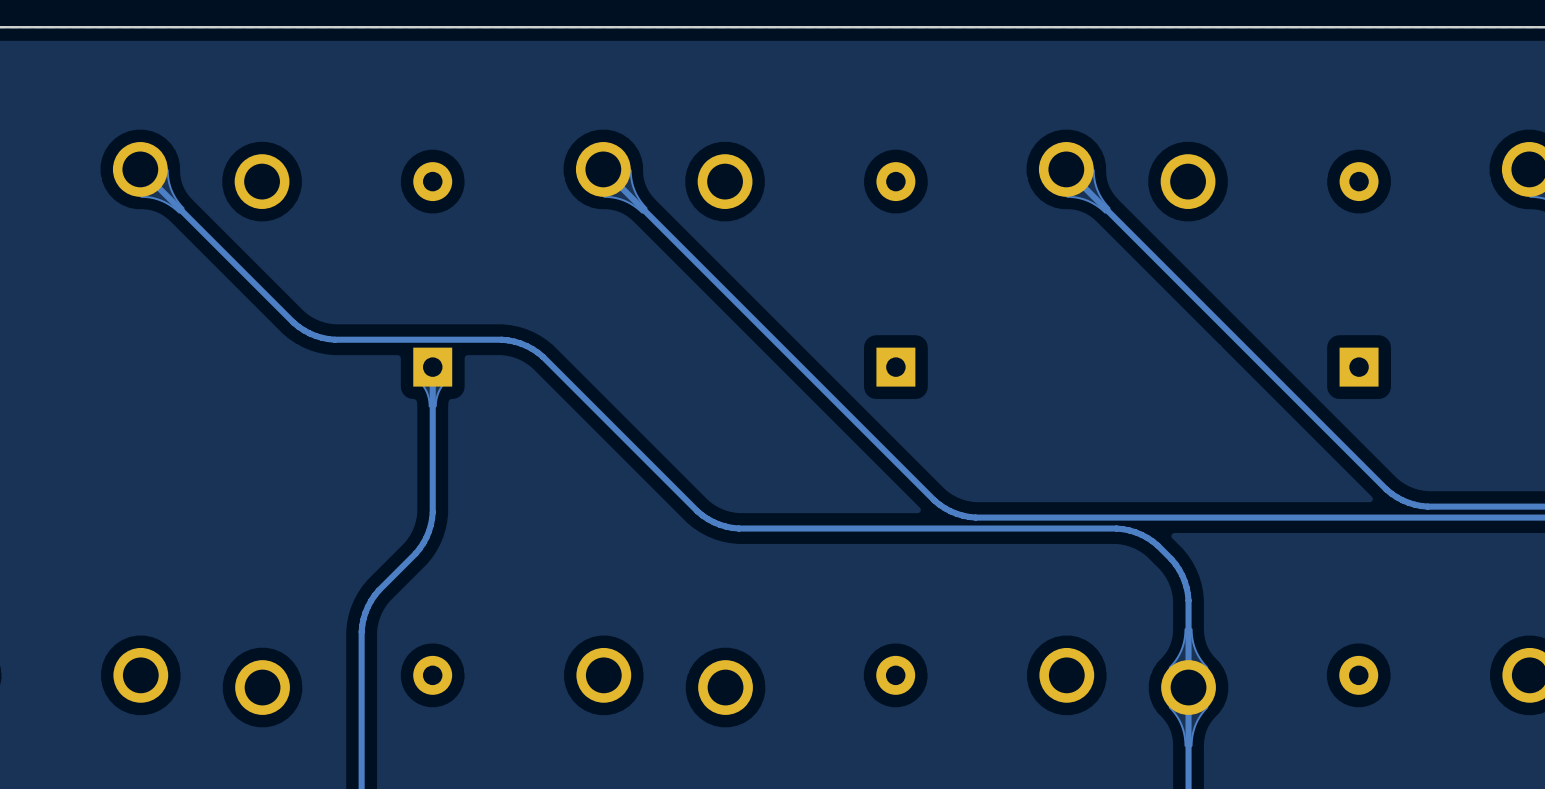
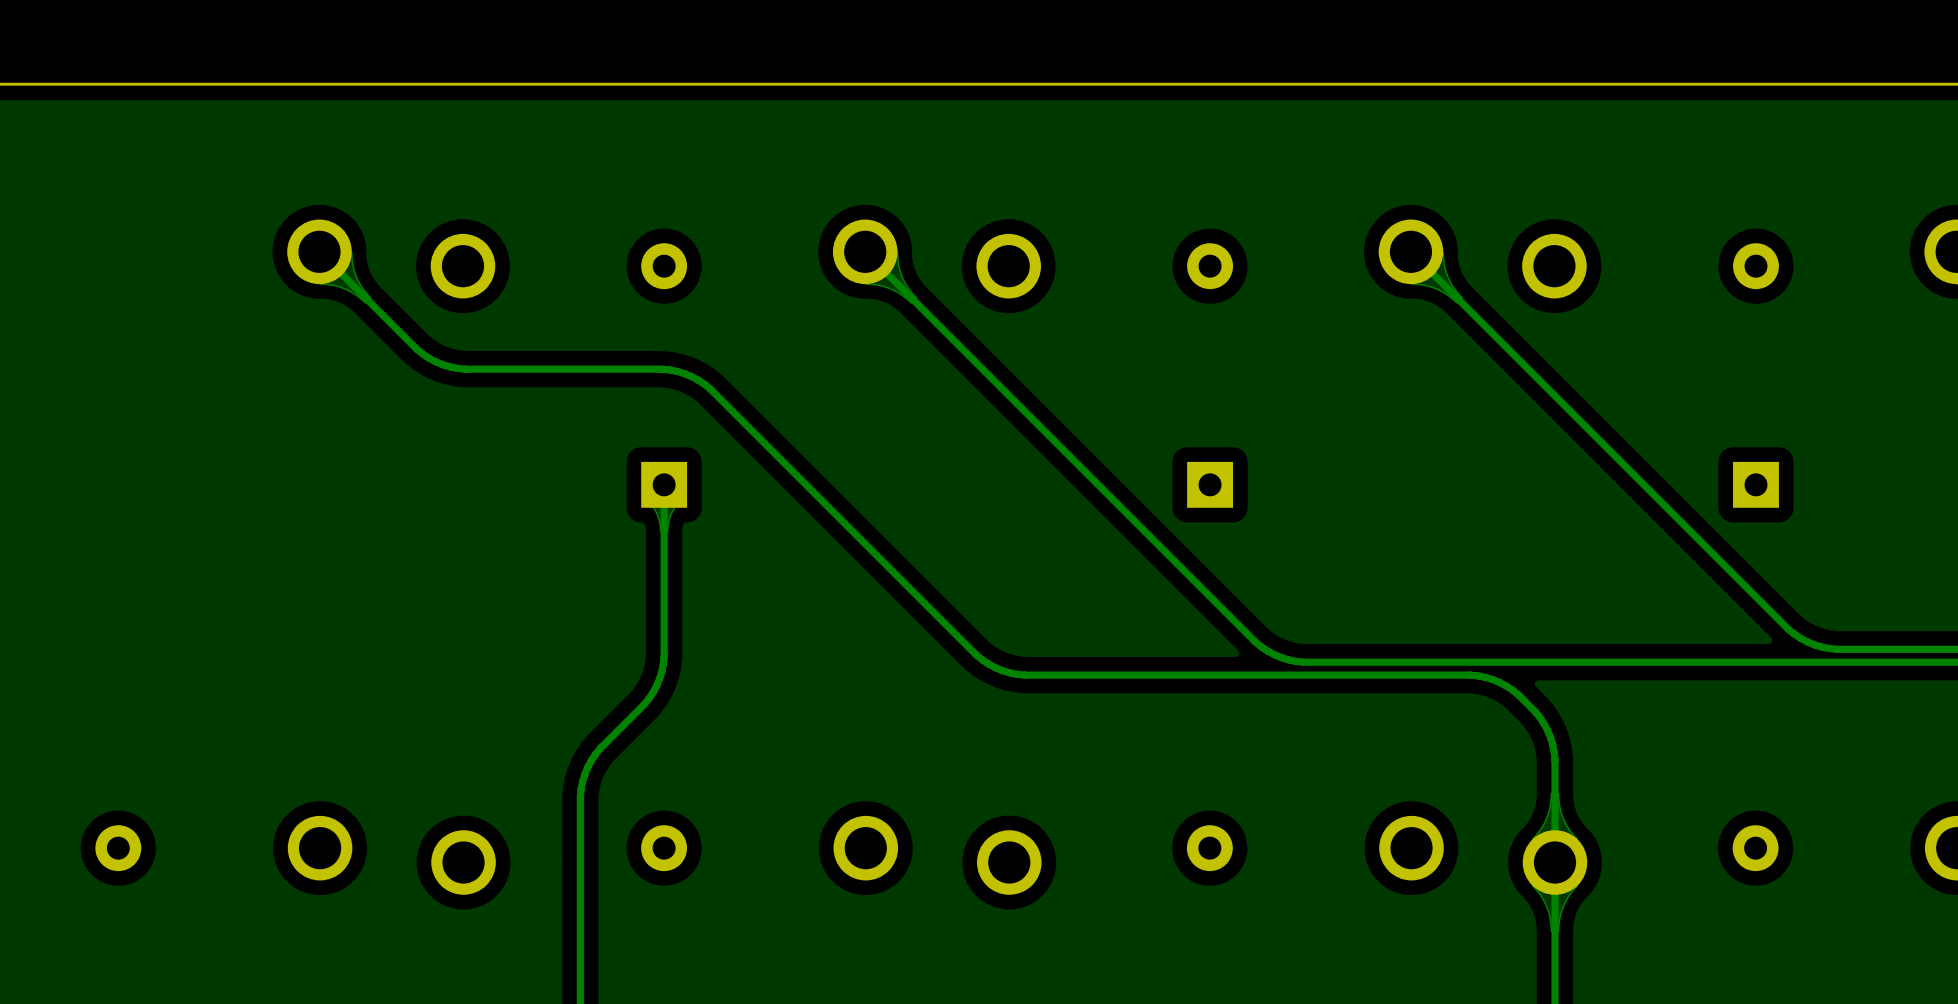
track: (222, 251) (293, 322) (315, 335) (334, 339) (501, 339) (526, 346) (542, 356) -> (416, 349) (435, 361) (450, 366) (465, 369) (662, 369) (684, 373) (698, 380) (710, 389) (794, 472)

